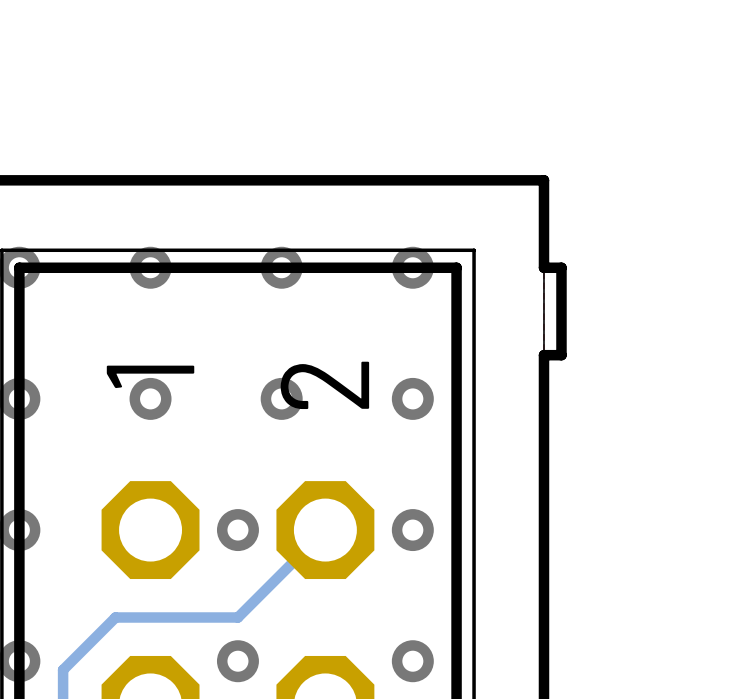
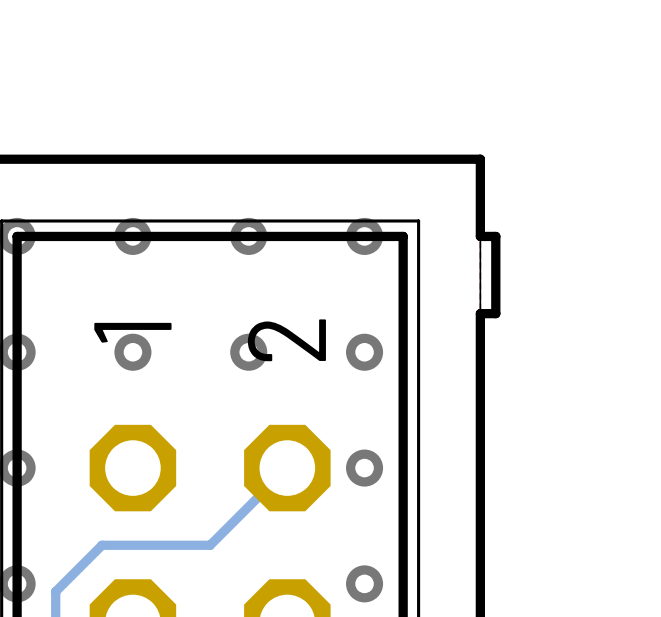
via: (237, 530) -> none
via: (237, 661) -> none

